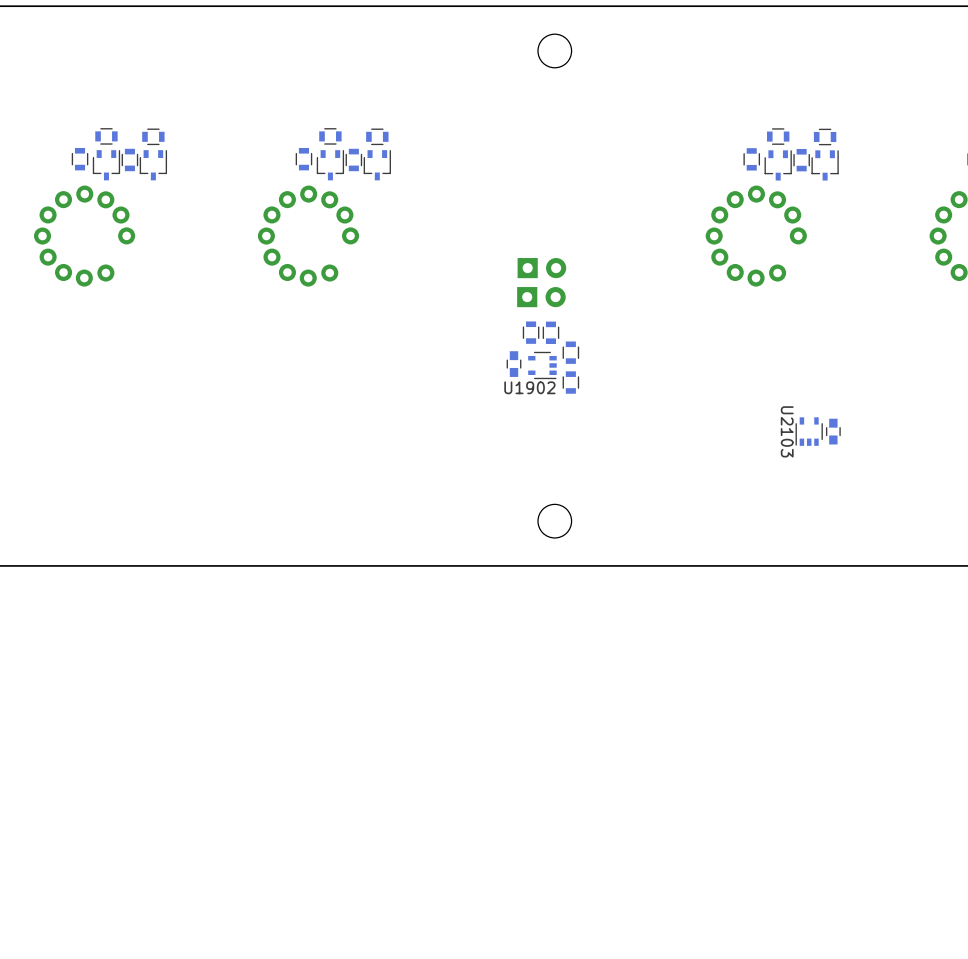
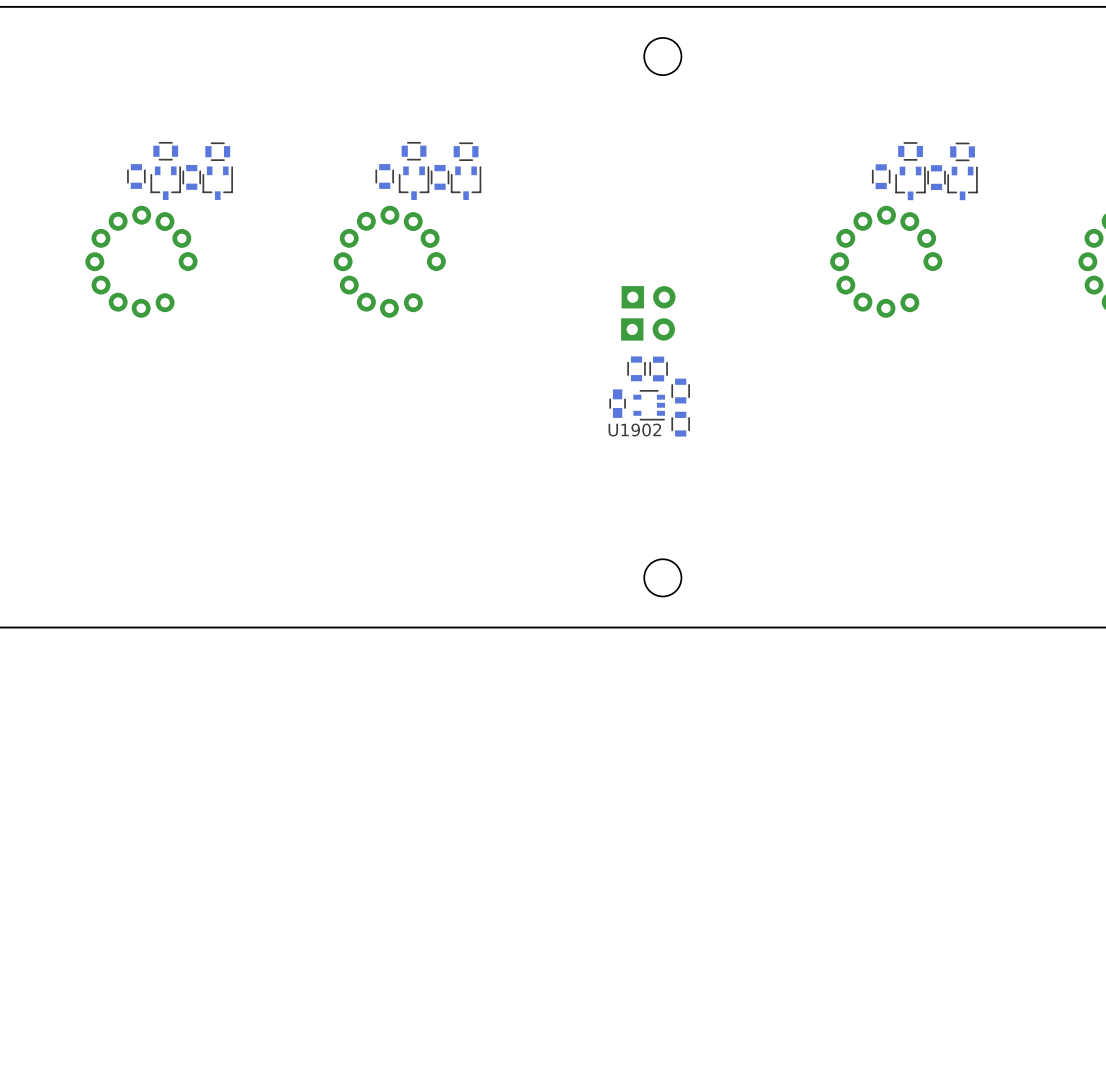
U2103: (809, 431) -> none
part: (833, 431) -> none

